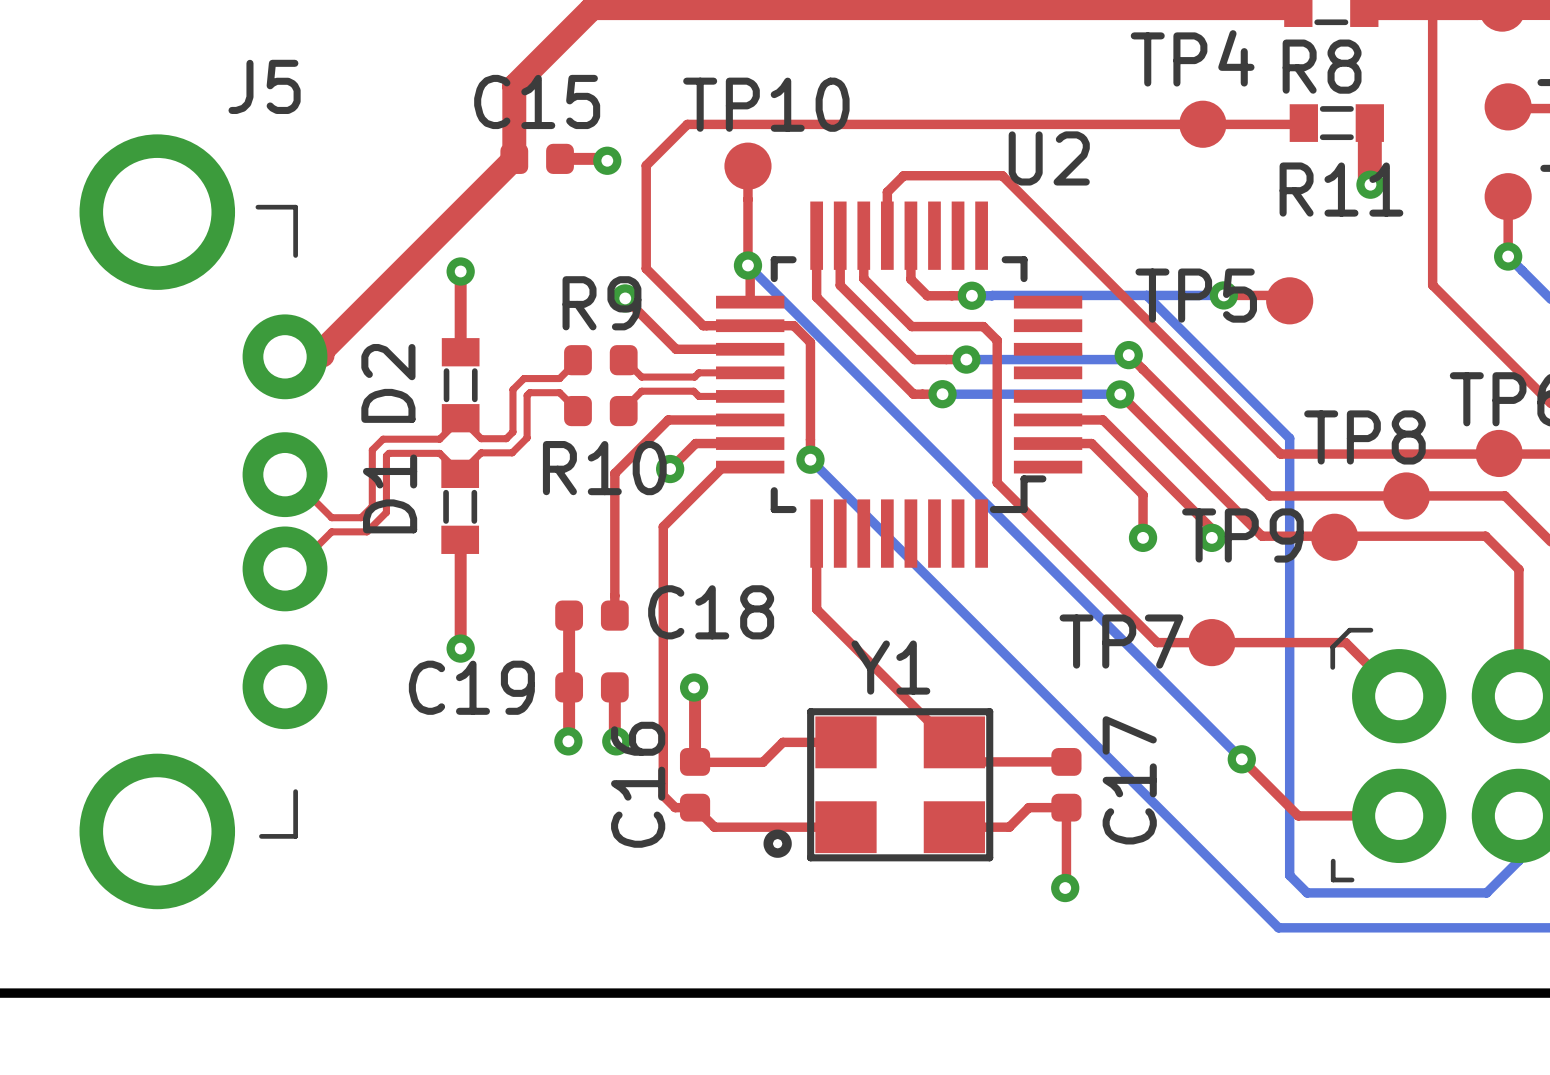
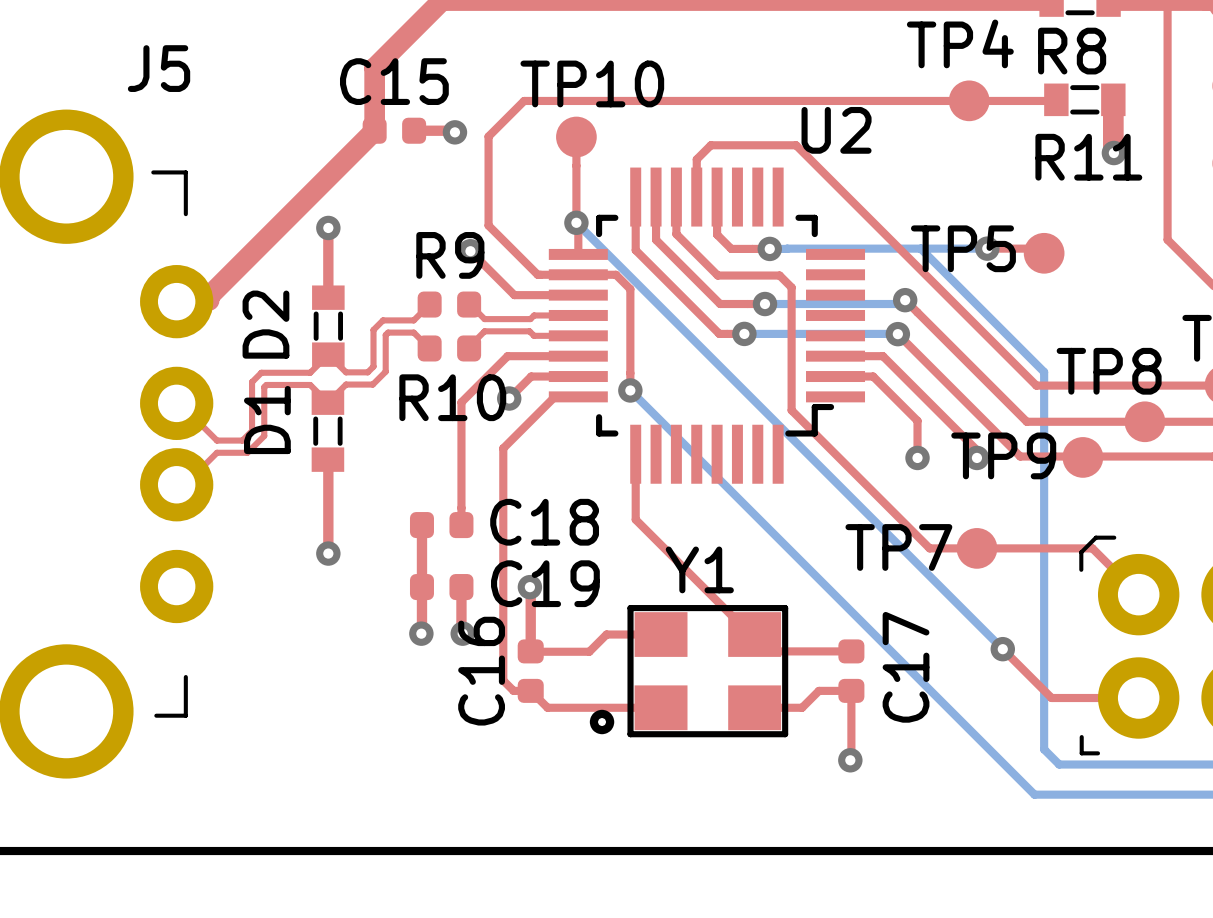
C19 name position: C19 (471, 687) -> C19 (545, 583)

